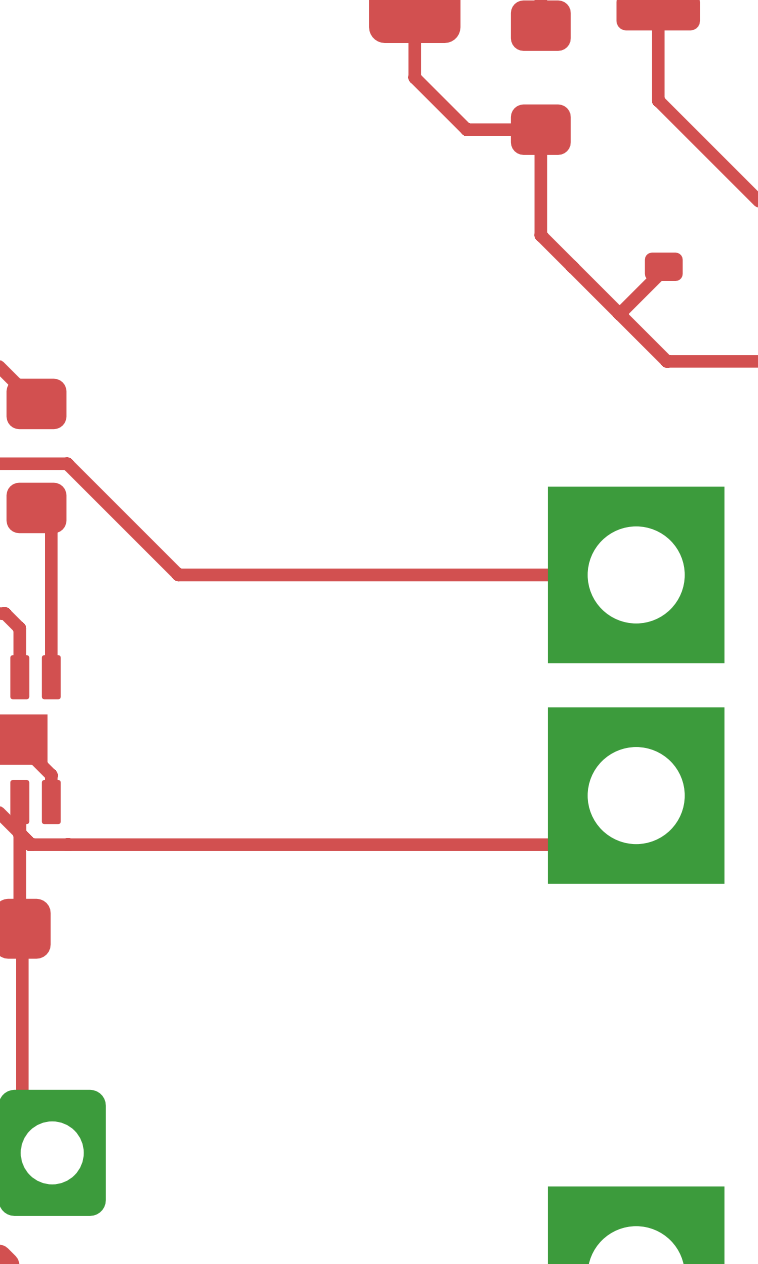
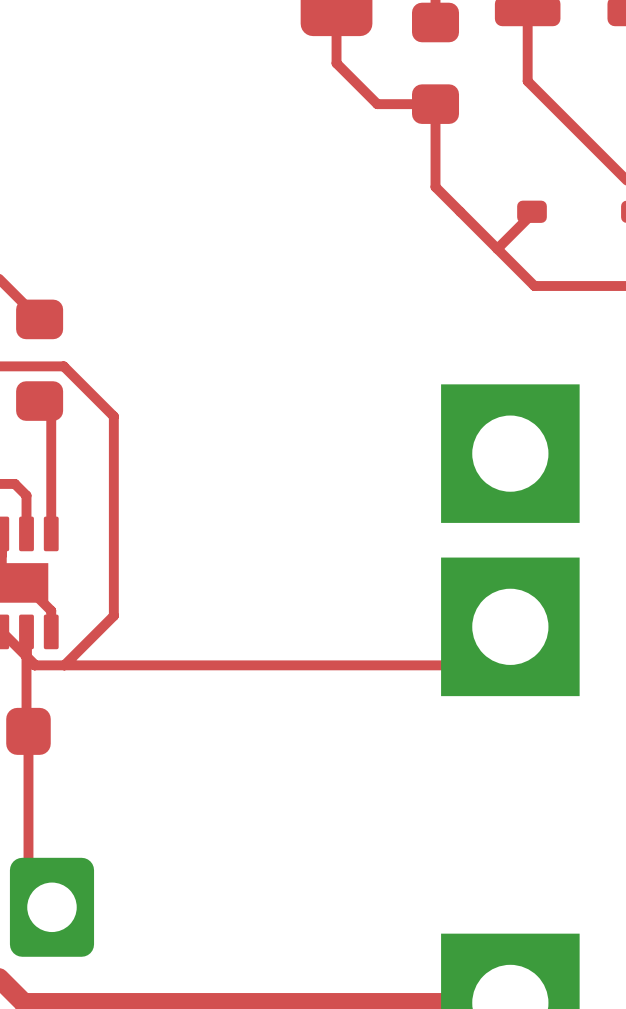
top track: (131, 527) (178, 574) (636, 574) -> (113, 416) (113, 615) (64, 665)

